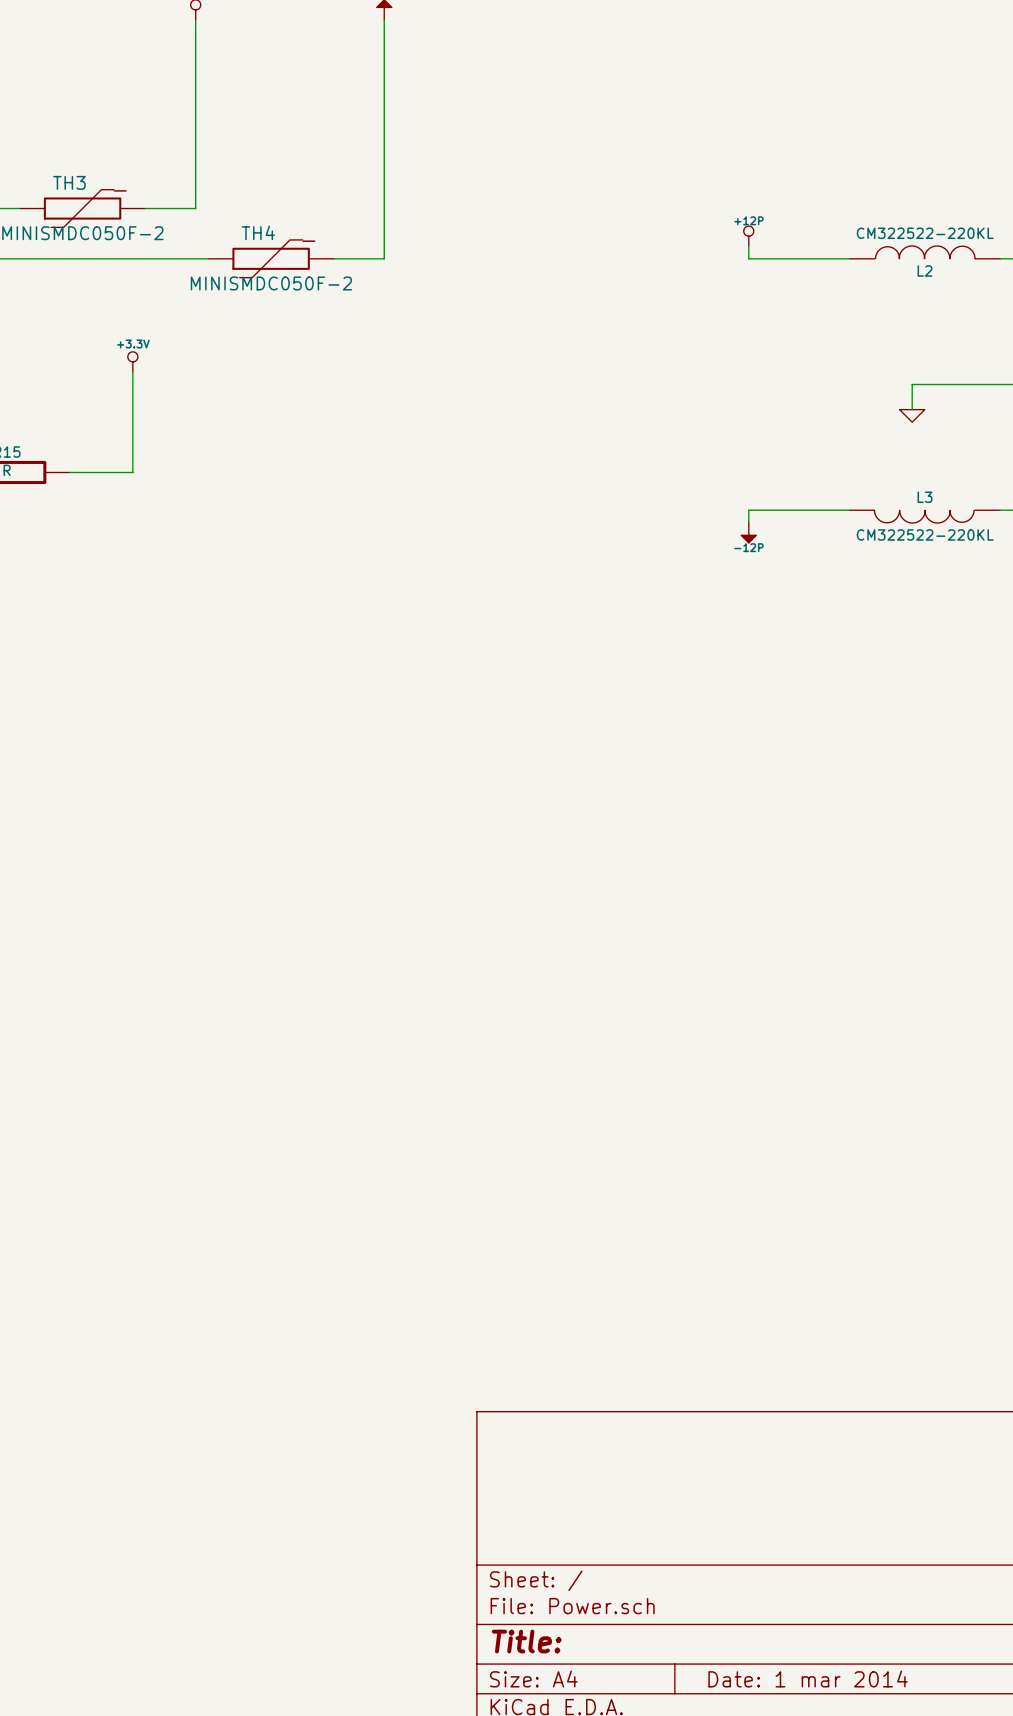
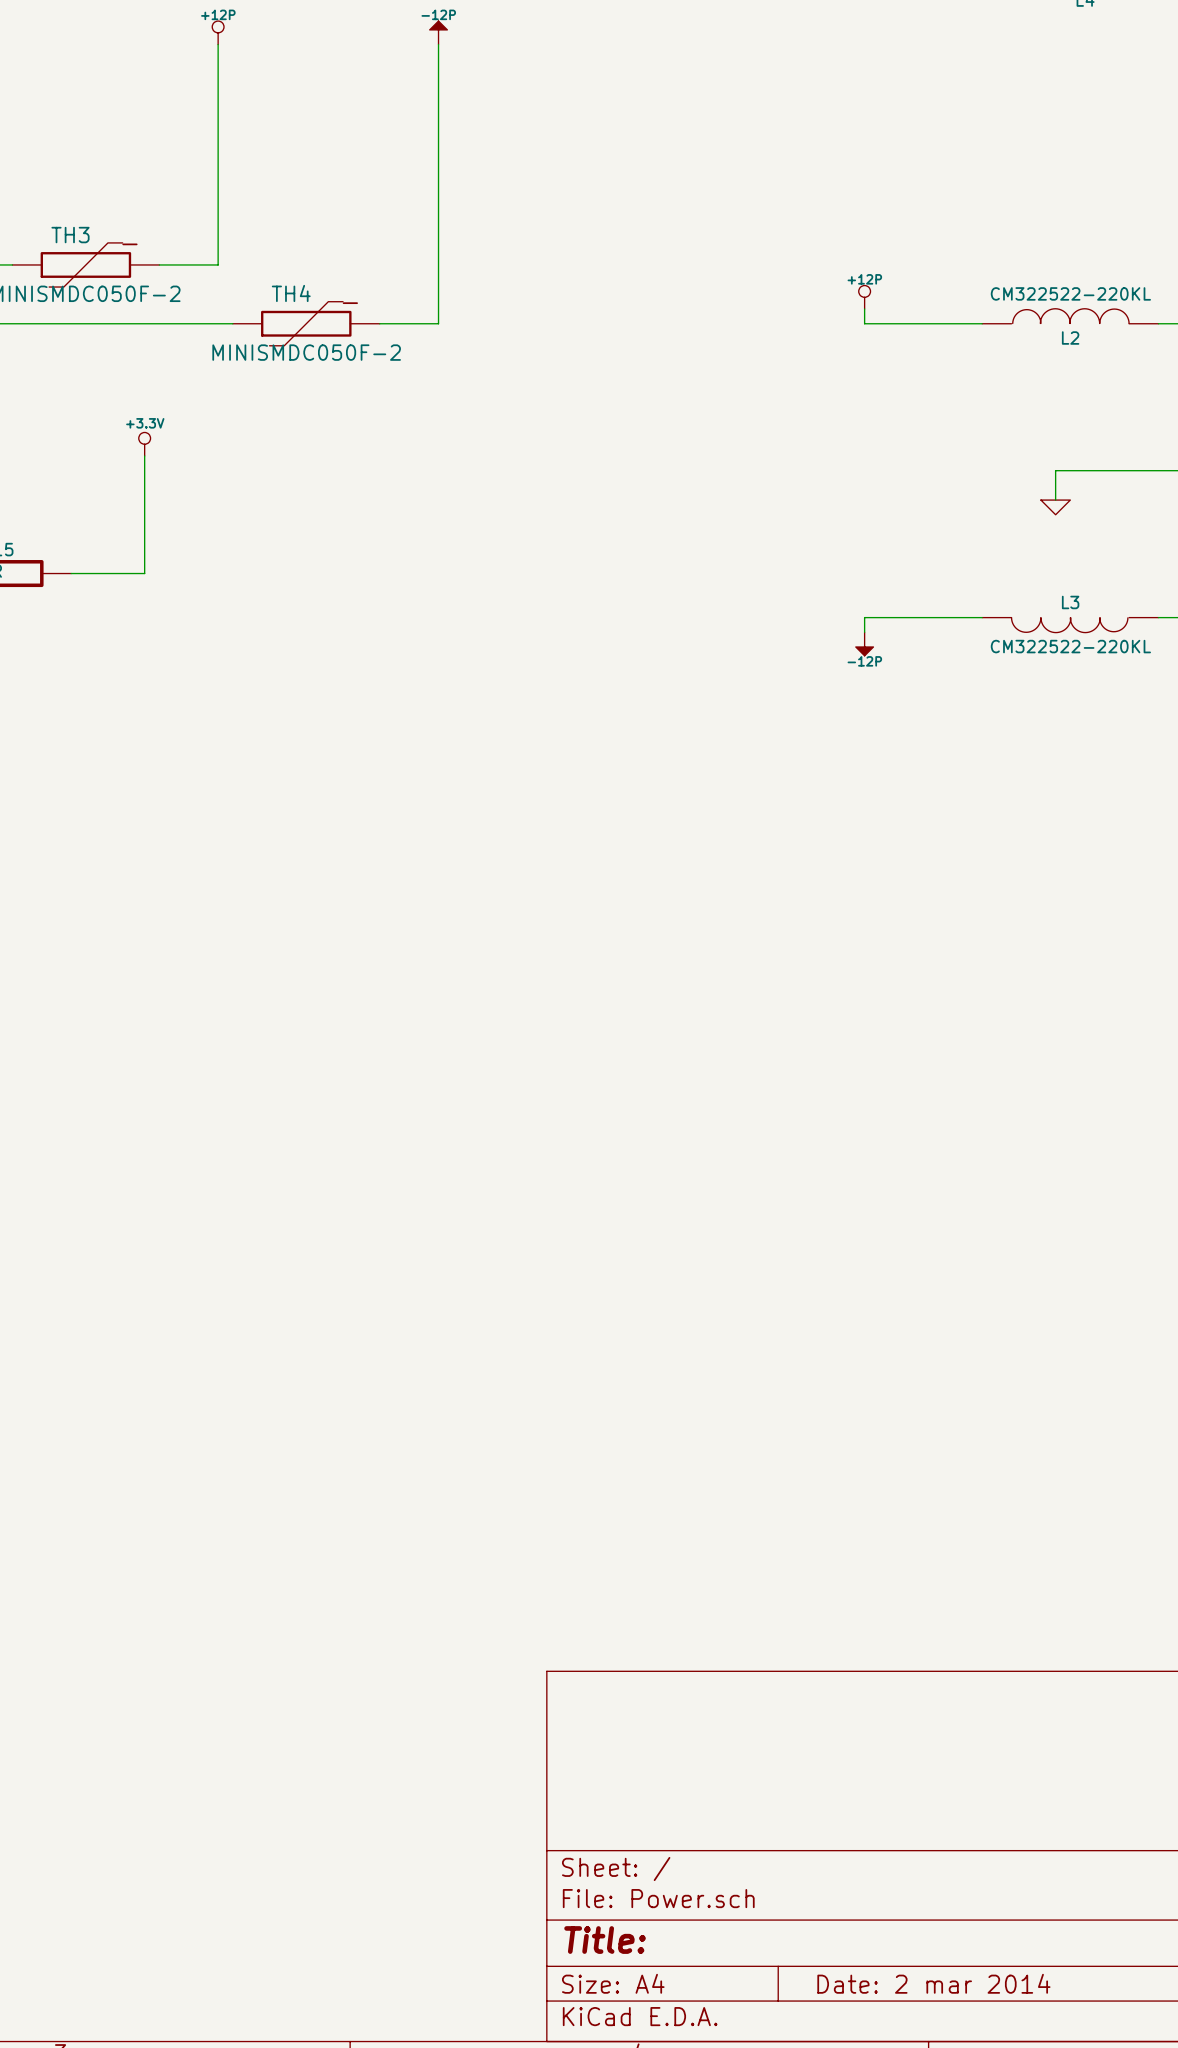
title block: Date: 1 mar 2014 (808, 1678) -> Date: 2 mar 2014 (933, 1983)

